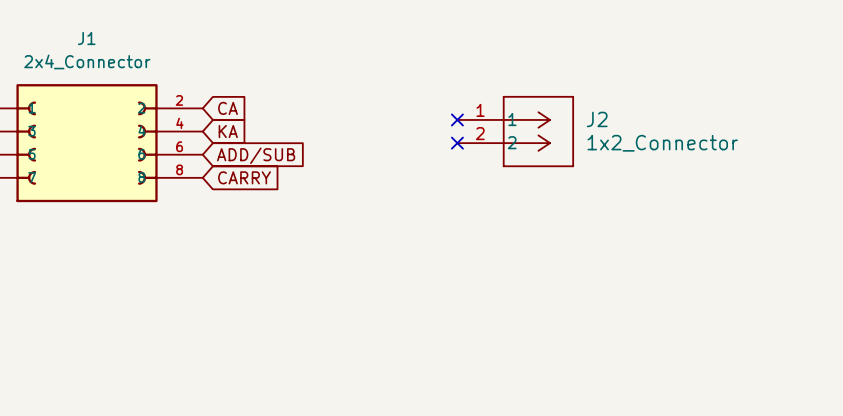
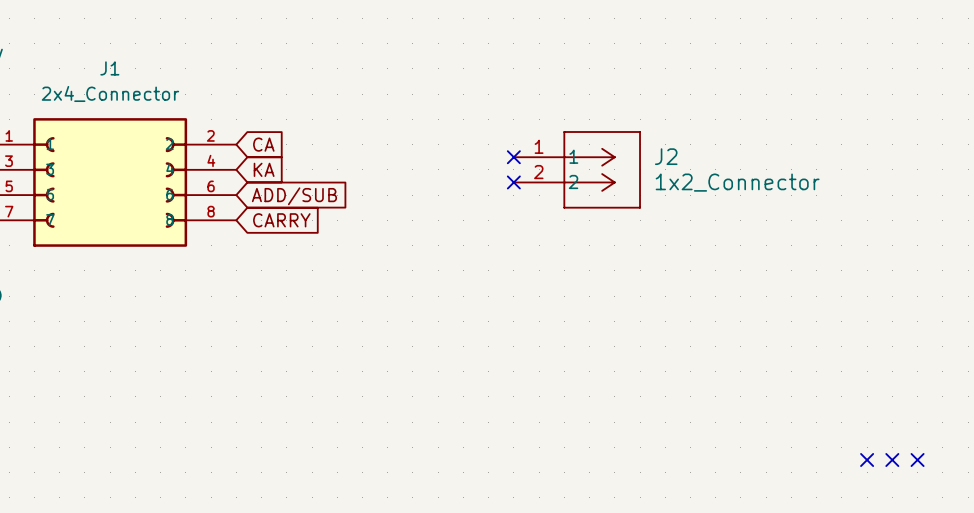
no-connect mark: none -> (867, 460)
no-connect mark: none -> (892, 460)
no-connect mark: none -> (917, 460)

